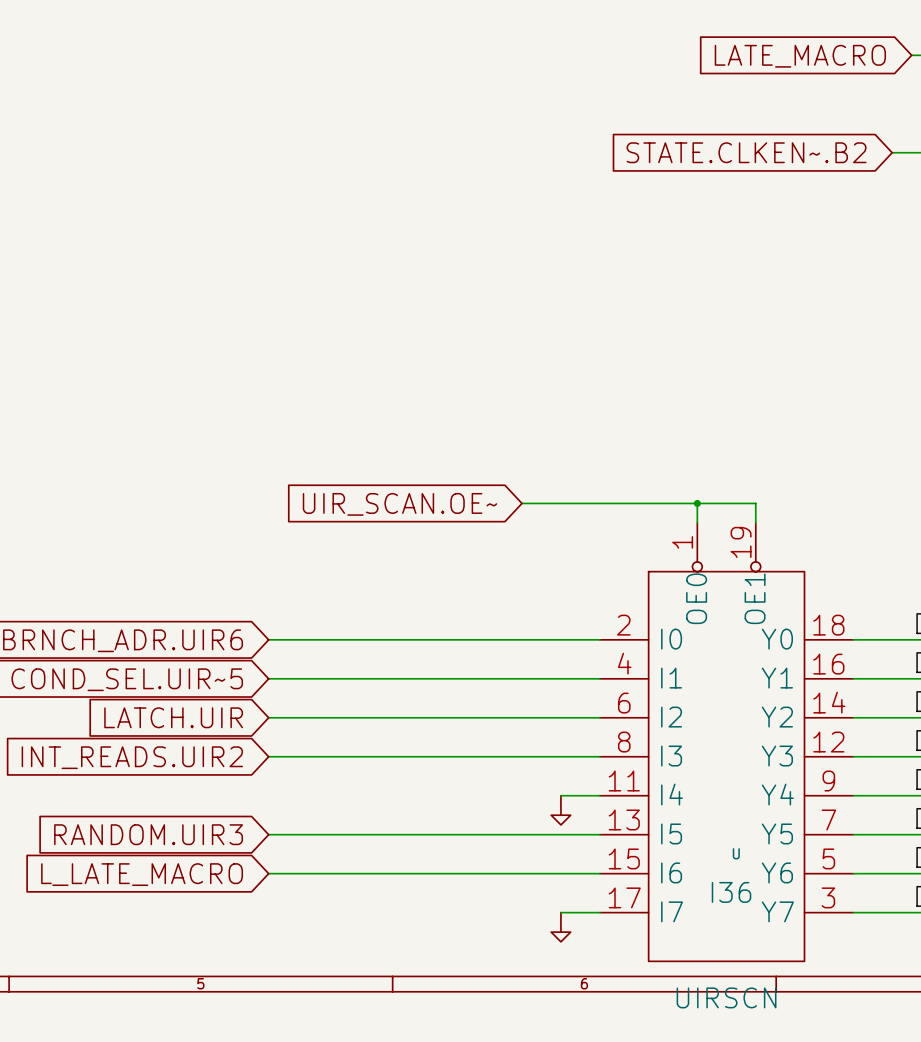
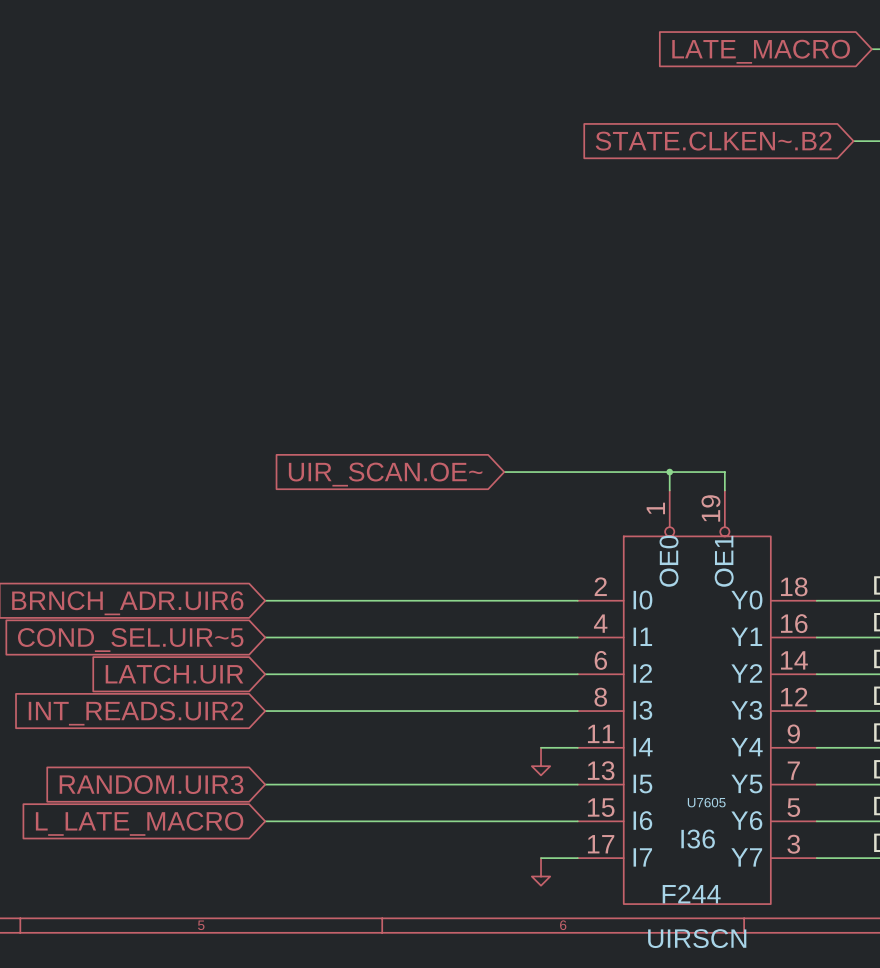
U name: U (736, 853) -> U7605 (706, 802)
U value: none -> F244 (691, 894)

